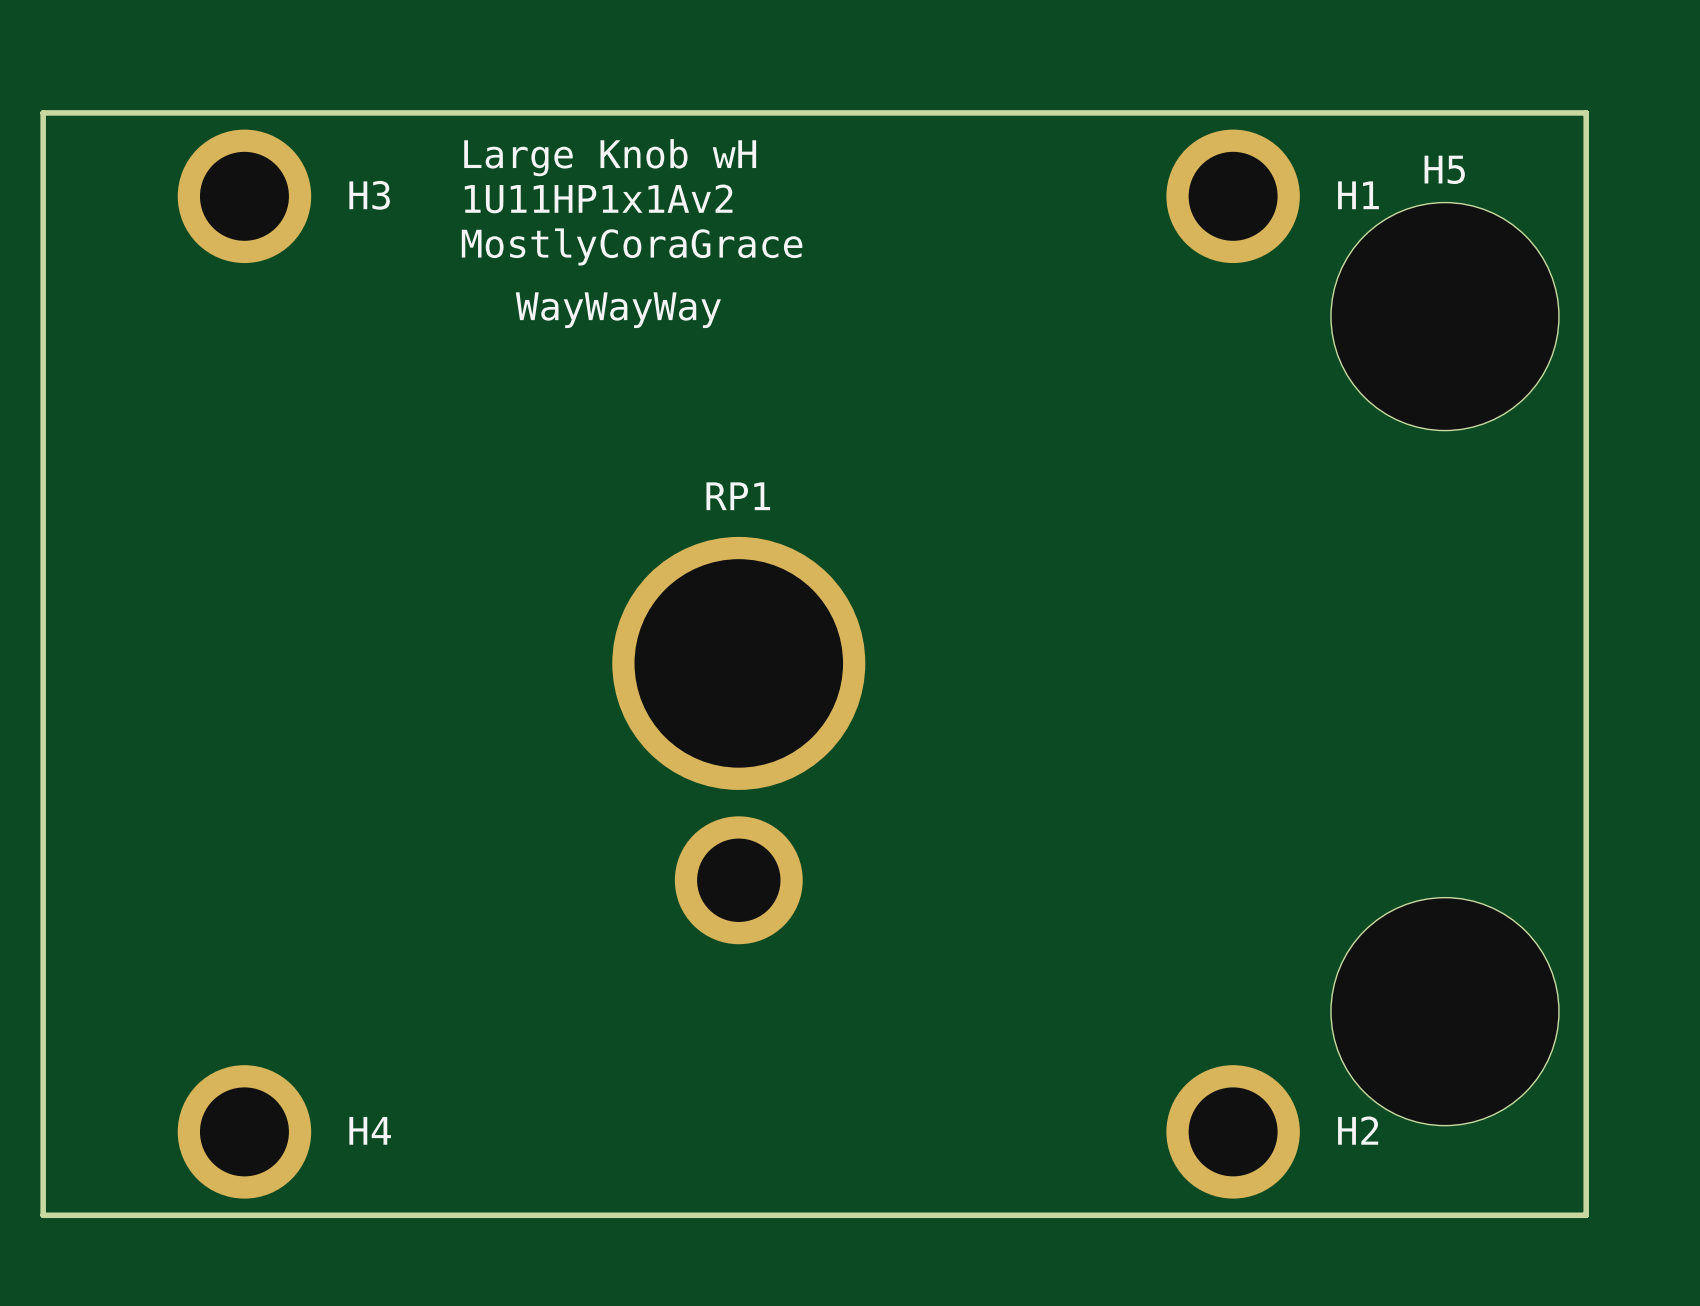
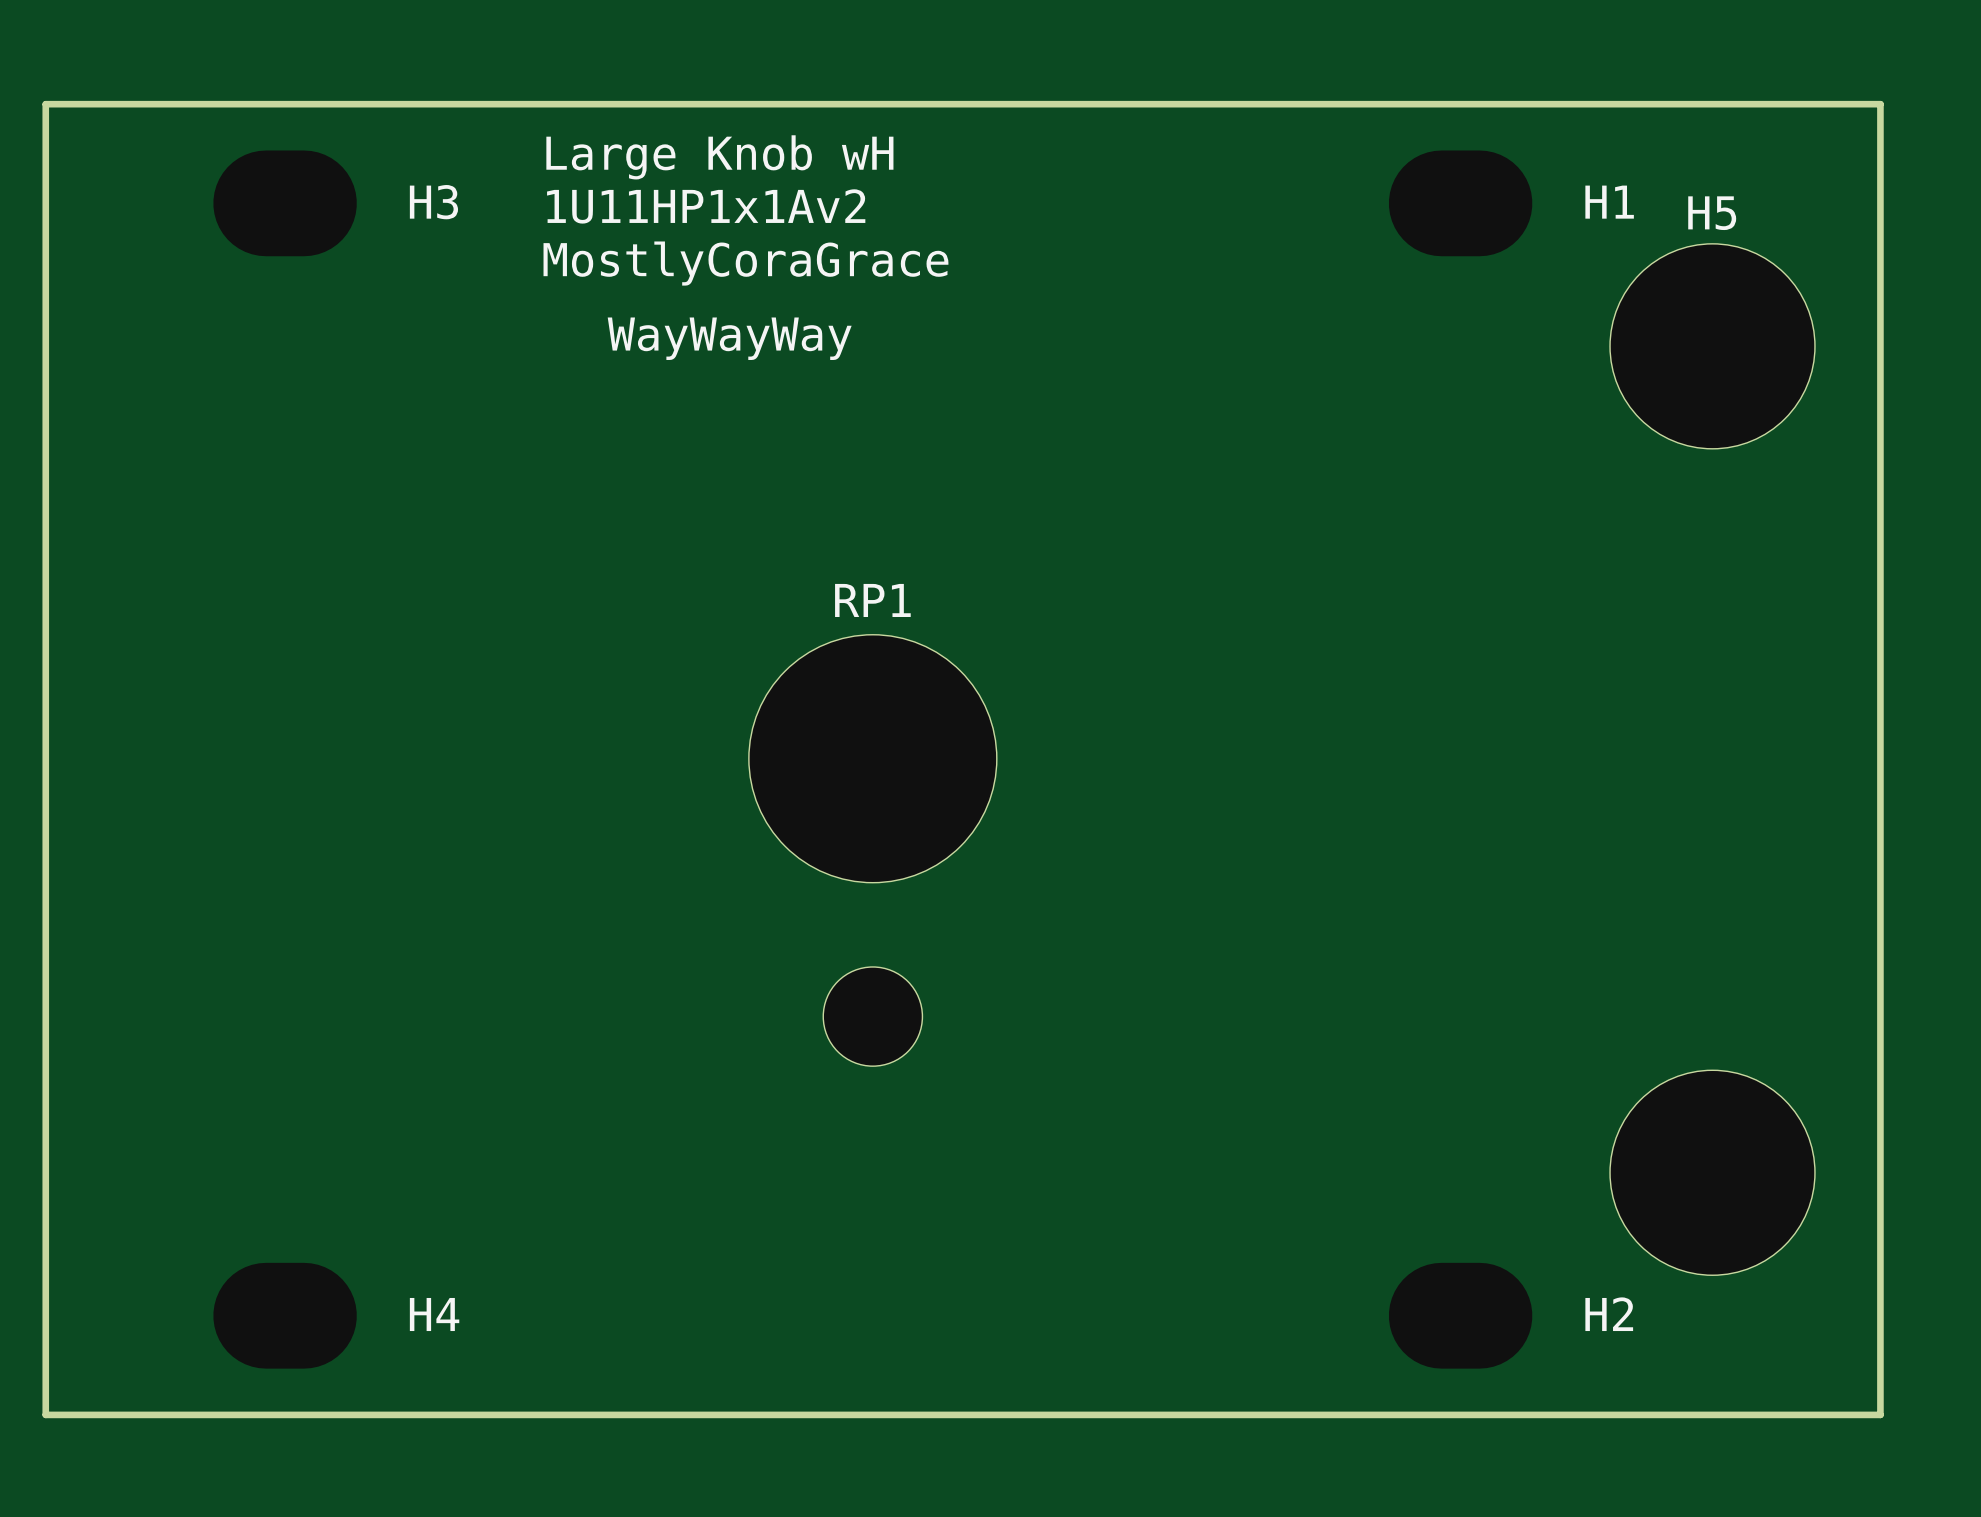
H3 footprint: [177, 129, 312, 264] -> [213, 150, 357, 257]
H1 footprint: [1166, 129, 1300, 264] -> [1388, 150, 1533, 257]
H5 footprint: [1330, 202, 1559, 1126] -> [1610, 243, 1815, 1276]
RP1 footprint: [612, 536, 866, 945] -> [748, 634, 997, 1067]
H4 footprint: [177, 1065, 312, 1199] -> [213, 1262, 357, 1369]
H2 footprint: [1166, 1065, 1300, 1199] -> [1388, 1262, 1533, 1369]

